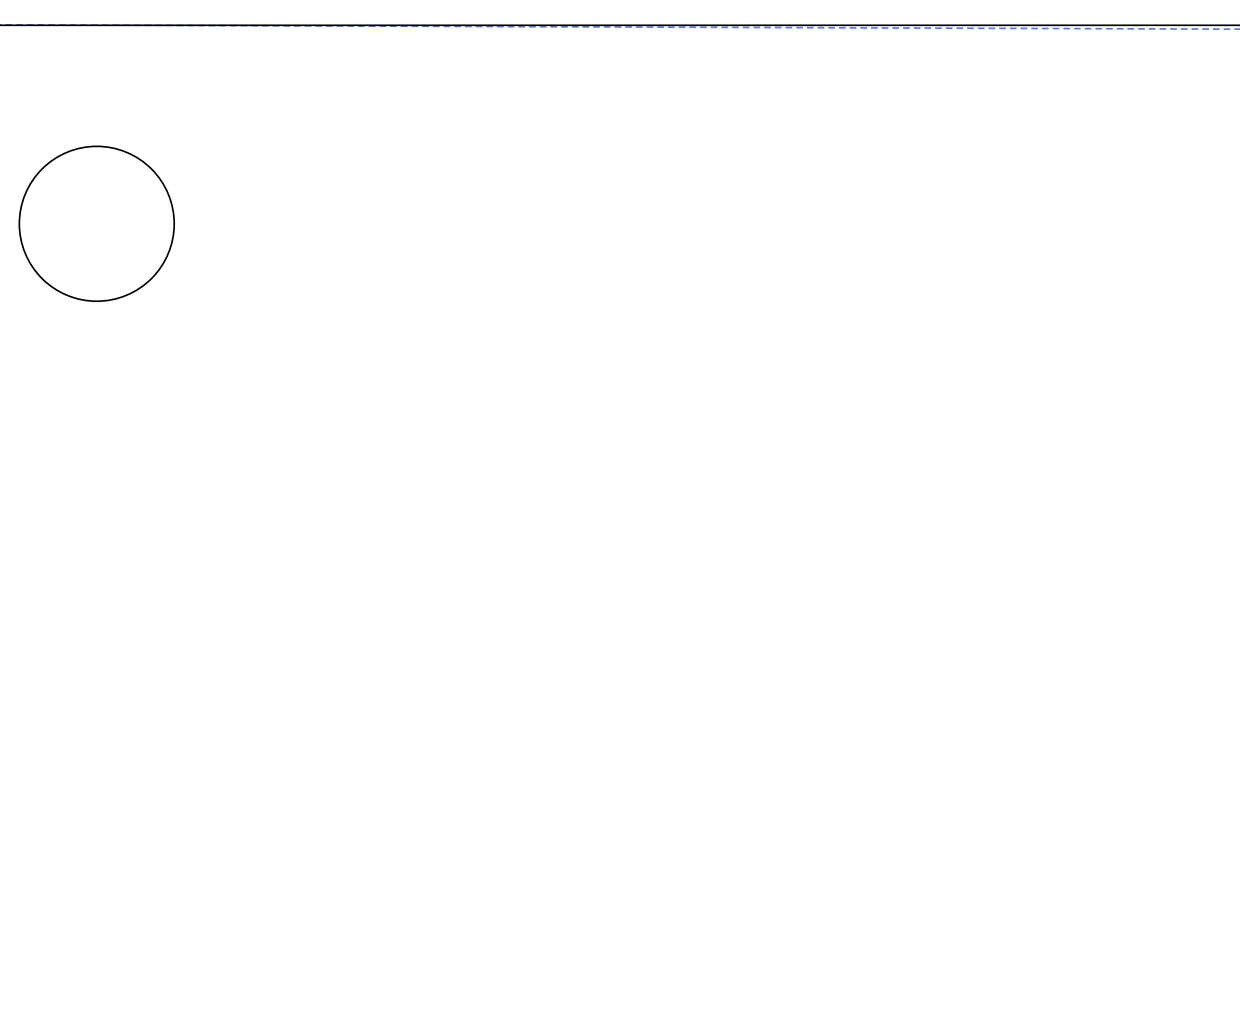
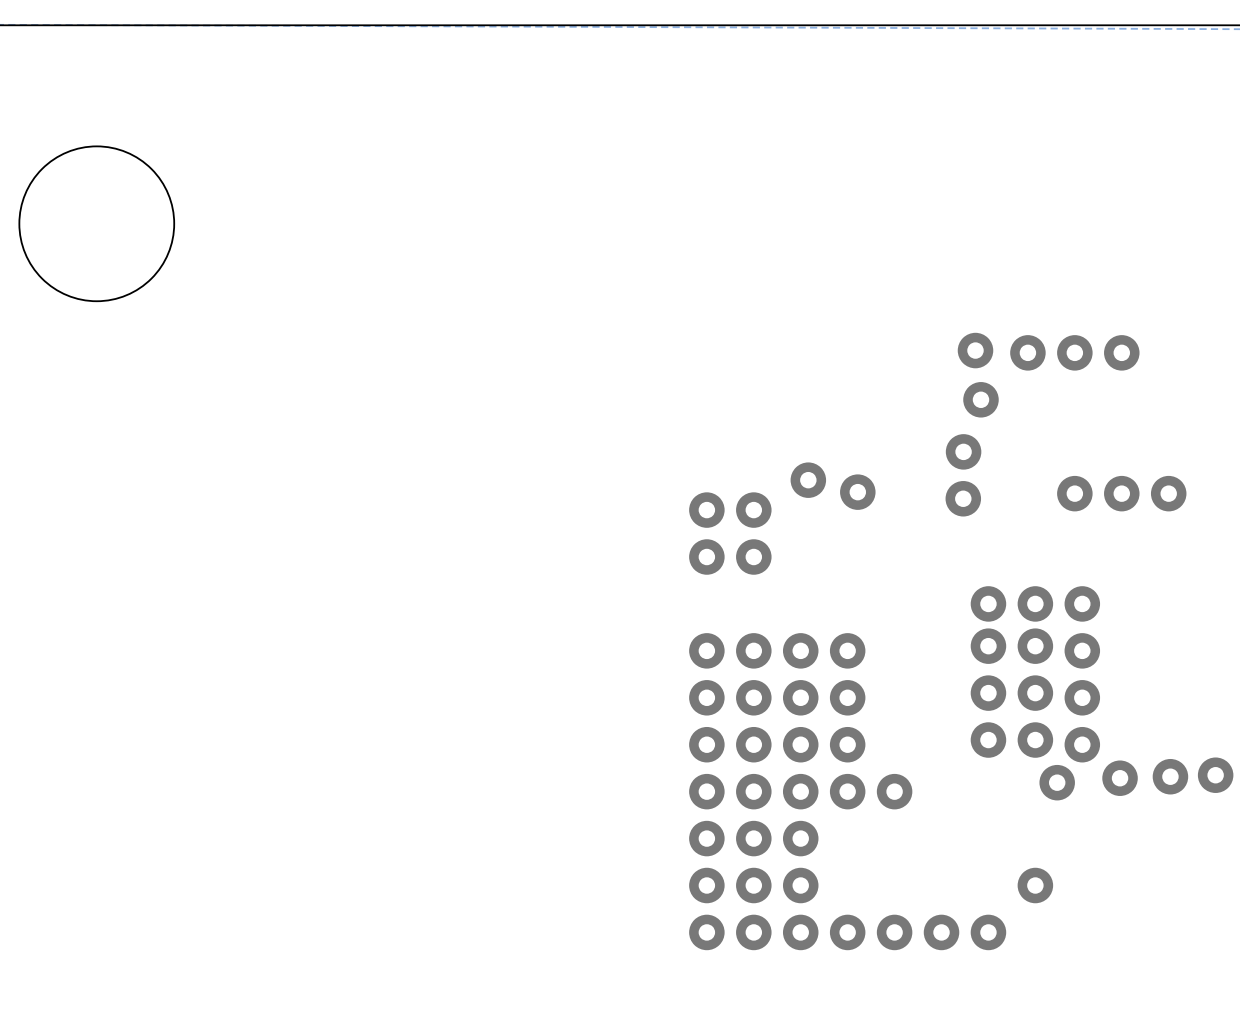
via: none -> (975, 350)
via: none -> (1027, 352)
via: none -> (1074, 352)
via: none -> (1121, 352)
via: none -> (980, 399)
via: none -> (963, 451)
via: none -> (808, 480)
via: none -> (857, 492)
via: none -> (1074, 493)
via: none -> (1121, 493)
via: none -> (1168, 493)
via: none -> (963, 498)
via: none -> (706, 510)
via: none -> (753, 510)
via: none -> (706, 557)
via: none -> (753, 557)
via: none -> (988, 603)
via: none -> (1035, 603)
via: none -> (1082, 603)
via: none -> (988, 646)
via: none -> (1035, 646)
via: none -> (706, 650)
via: none -> (753, 650)
via: none -> (800, 650)
via: none -> (847, 650)
via: none -> (1082, 650)
via: none -> (988, 693)
via: none -> (1035, 693)
via: none -> (706, 697)
via: none -> (753, 697)
via: none -> (800, 697)
via: none -> (847, 697)
via: none -> (1082, 697)
via: none -> (988, 740)
via: none -> (1035, 740)
via: none -> (706, 744)
via: none -> (753, 744)
via: none -> (800, 744)
via: none -> (847, 744)
via: none -> (1082, 744)
via: none -> (1215, 775)
via: none -> (1170, 776)
via: none -> (1120, 778)
via: none -> (1057, 782)
via: none -> (706, 791)
via: none -> (753, 791)
via: none -> (800, 791)
via: none -> (847, 791)
via: none -> (894, 791)
via: none -> (706, 838)
via: none -> (753, 838)
via: none -> (800, 838)
via: none -> (706, 885)
via: none -> (753, 885)
via: none -> (800, 885)
via: none -> (1035, 885)
via: none -> (706, 932)
via: none -> (753, 932)
via: none -> (800, 932)
via: none -> (847, 932)
via: none -> (894, 932)
via: none -> (941, 932)
via: none -> (988, 932)

